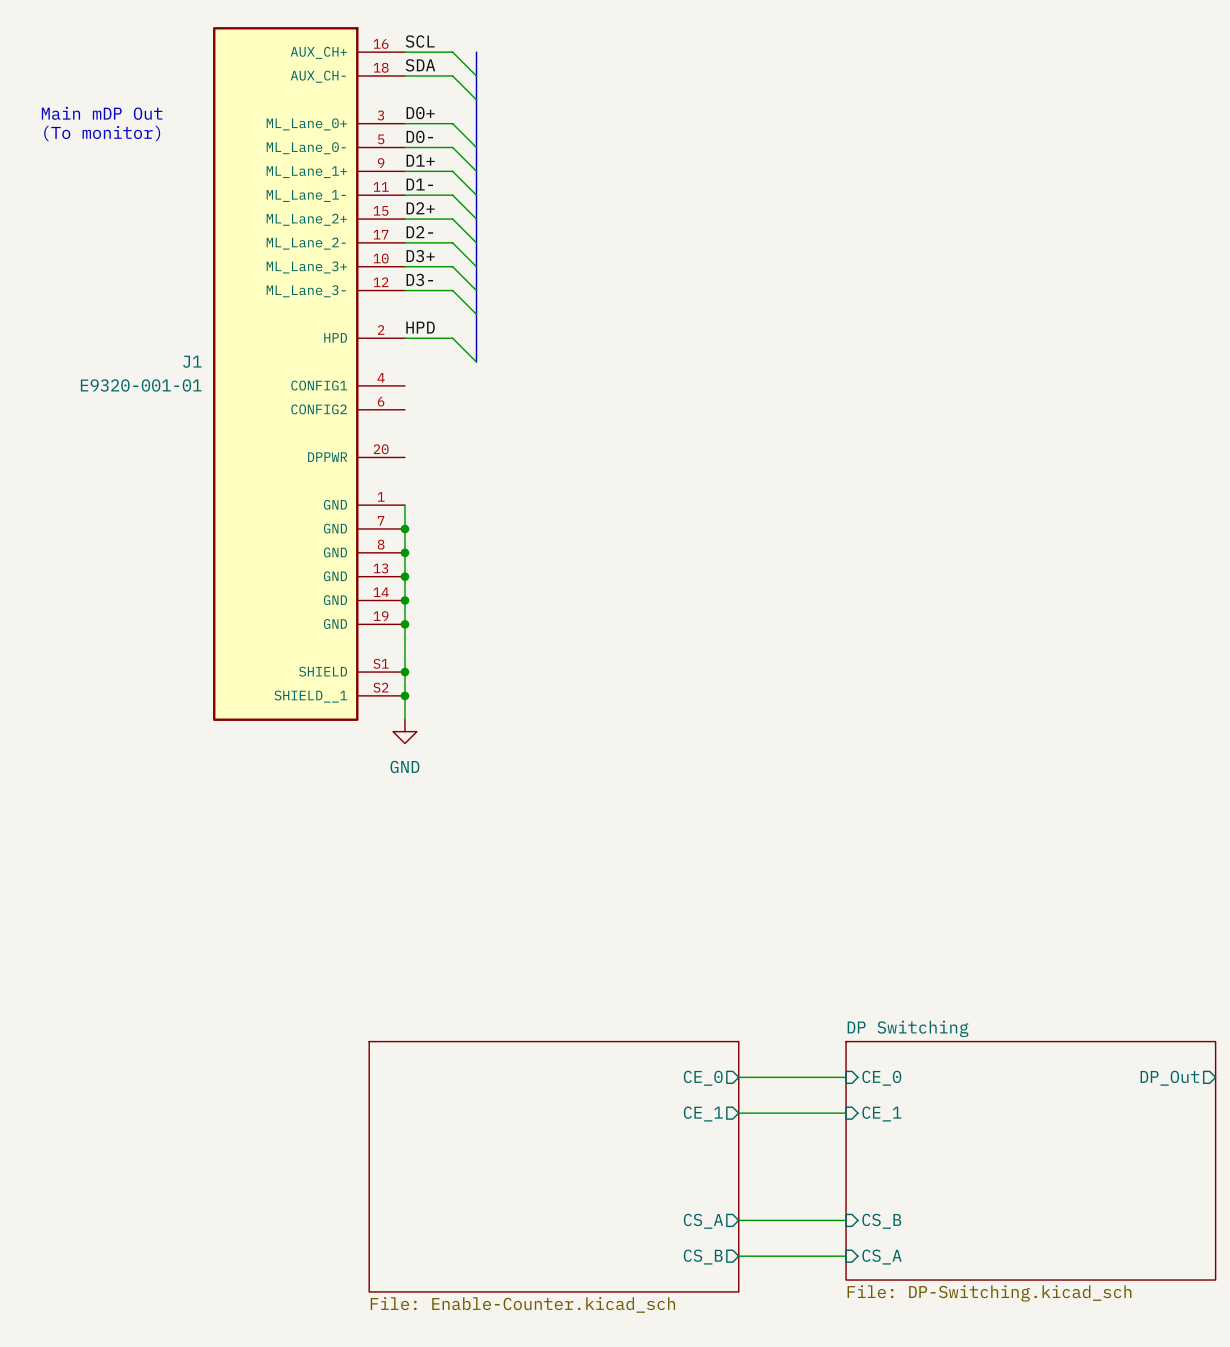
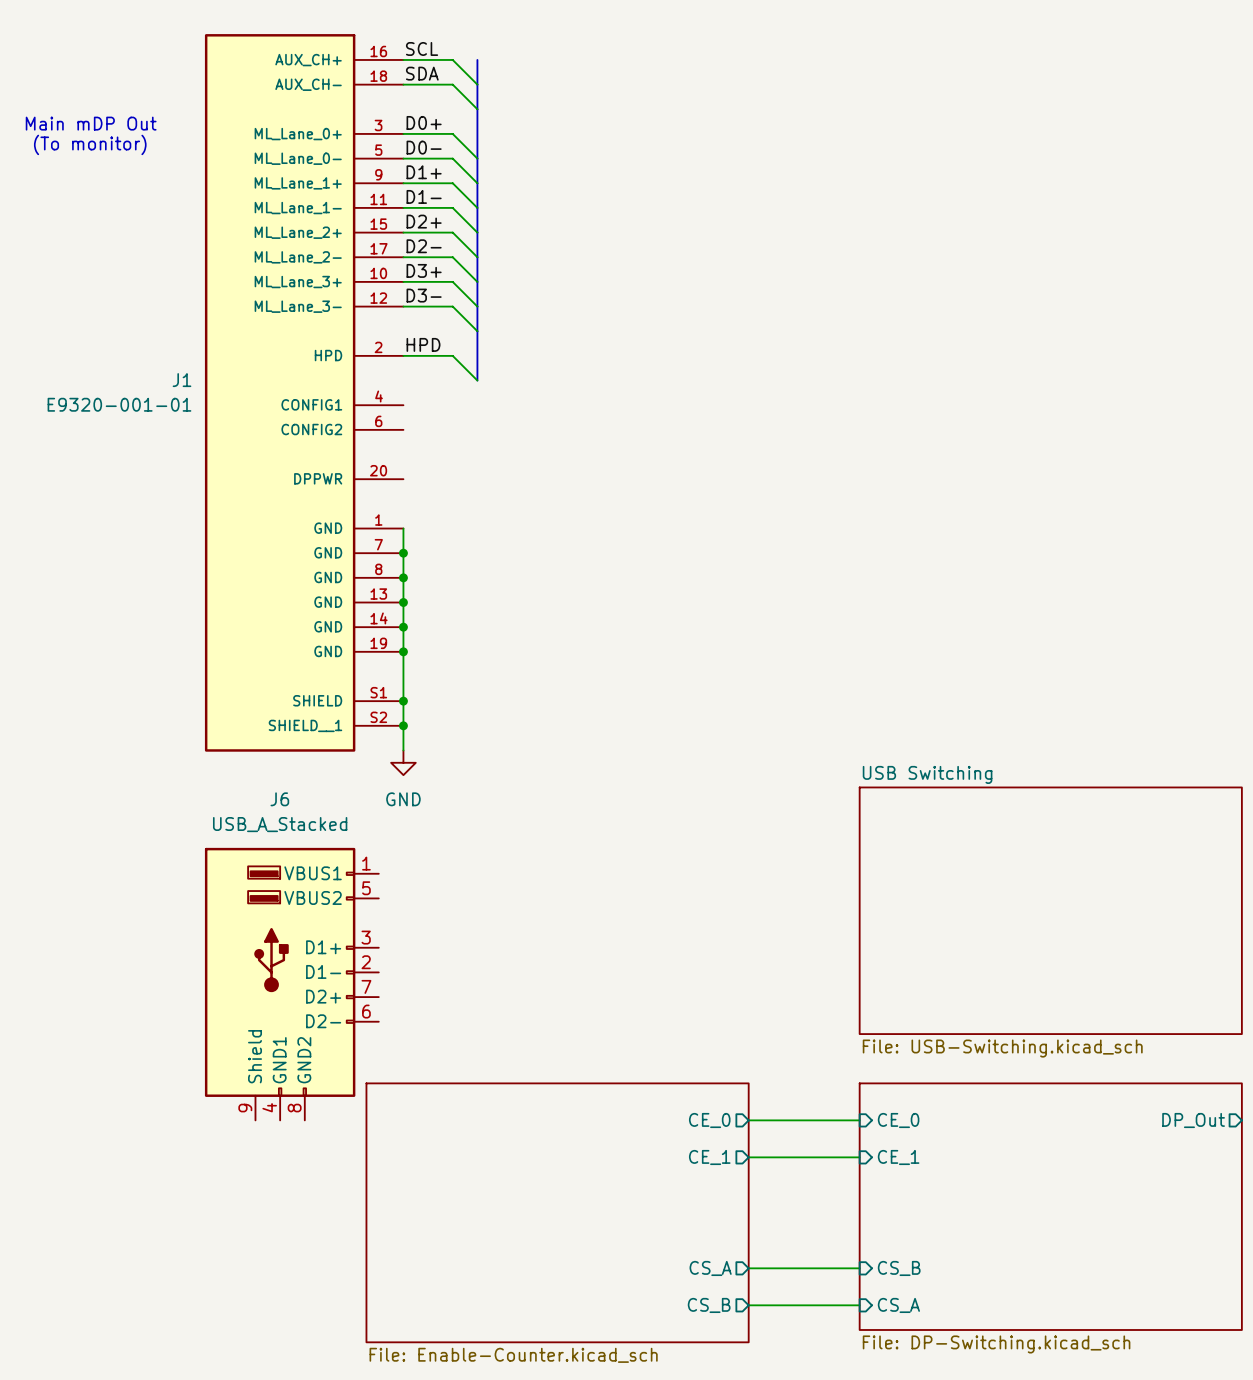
sheet USB Switching: none -> File: USB-Switching.kicad_sch (1050, 910)
J6: none -> USB_A_Stacked (291, 984)
sheet DP Switching name: DP Switching (908, 1028) -> none

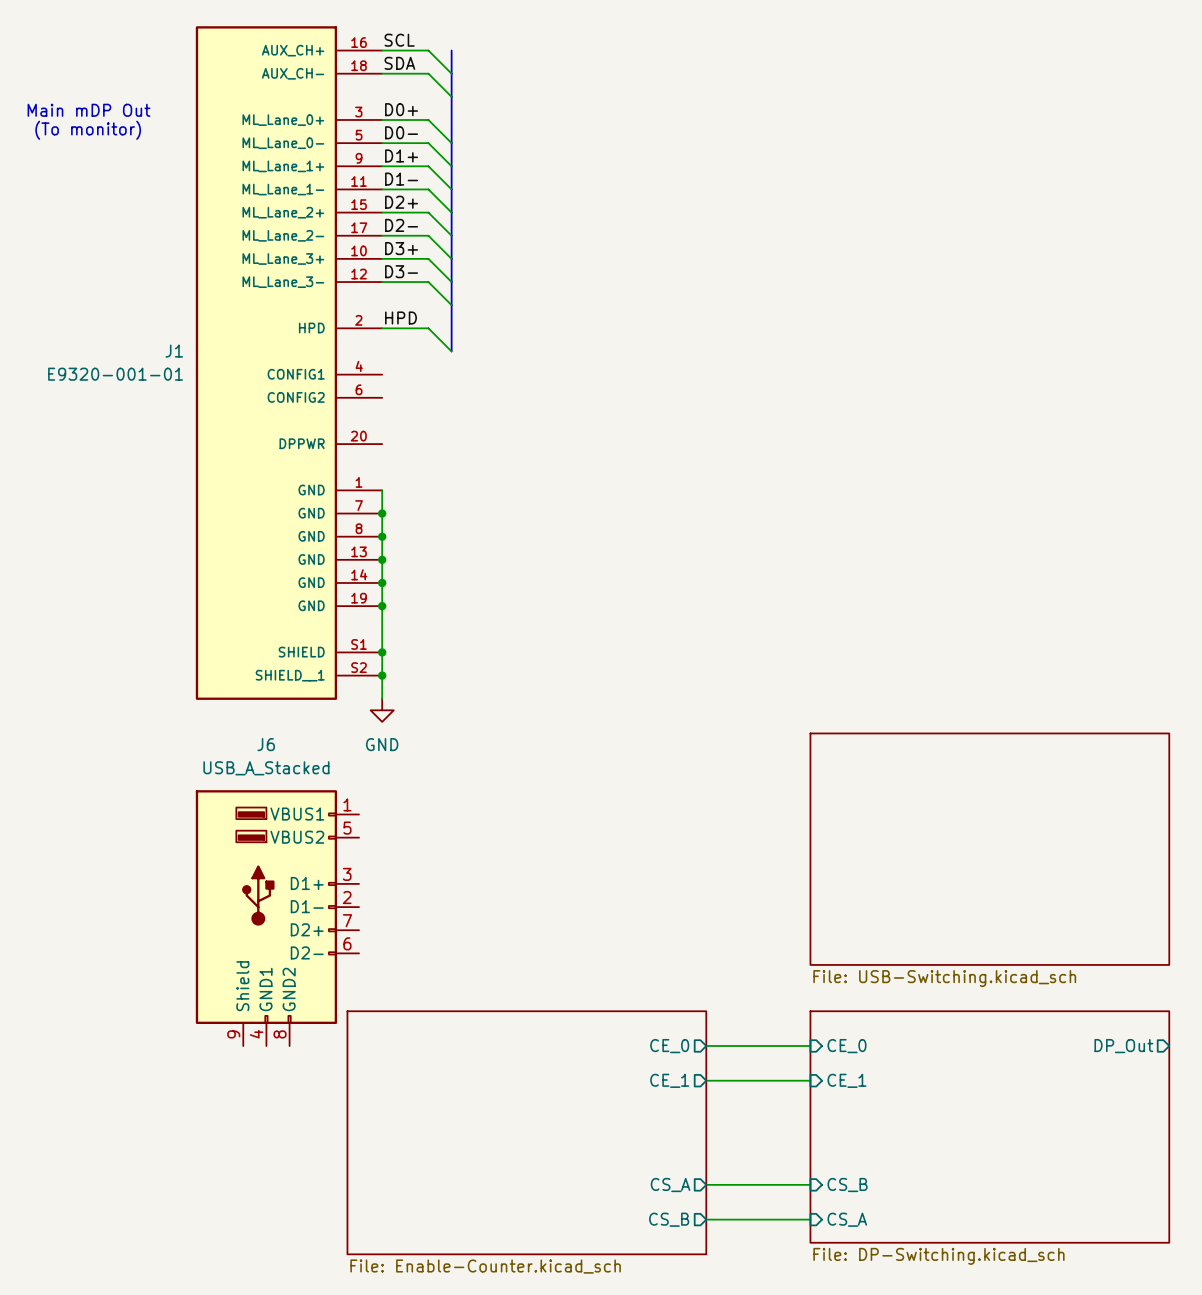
sheet USB Switching name: USB Switching (927, 774) -> none

